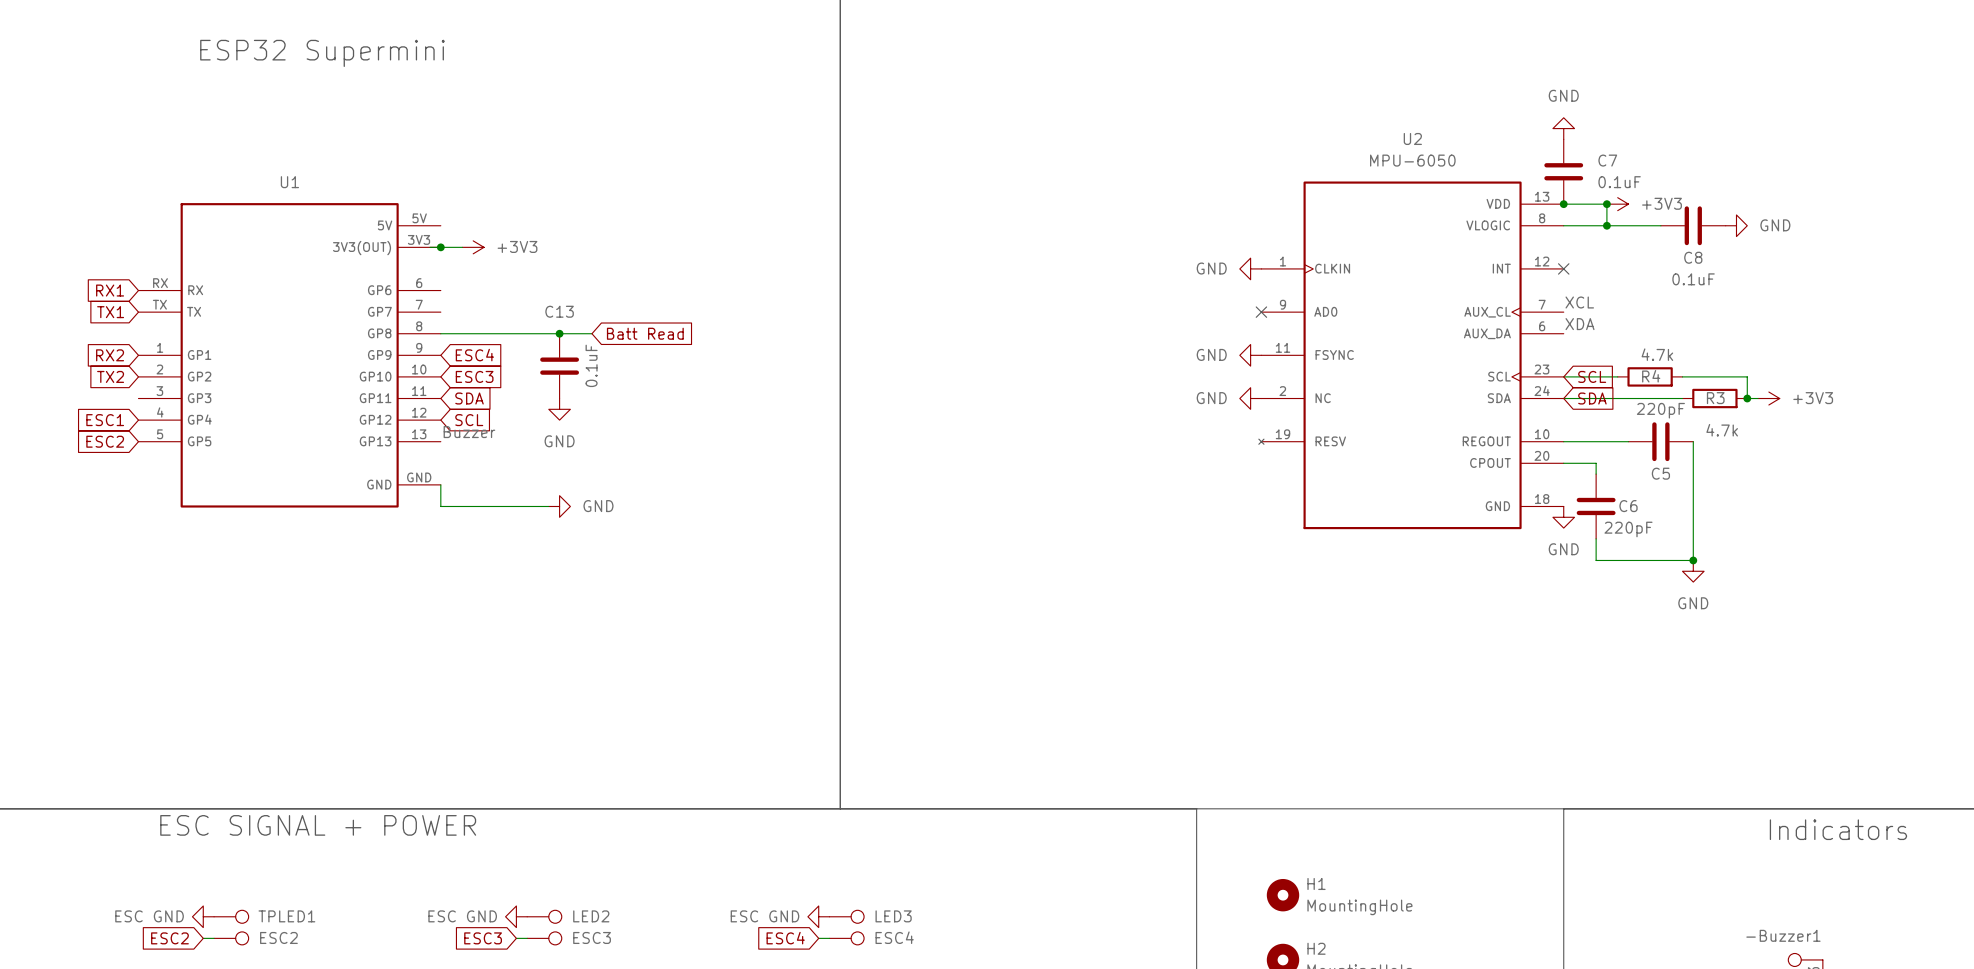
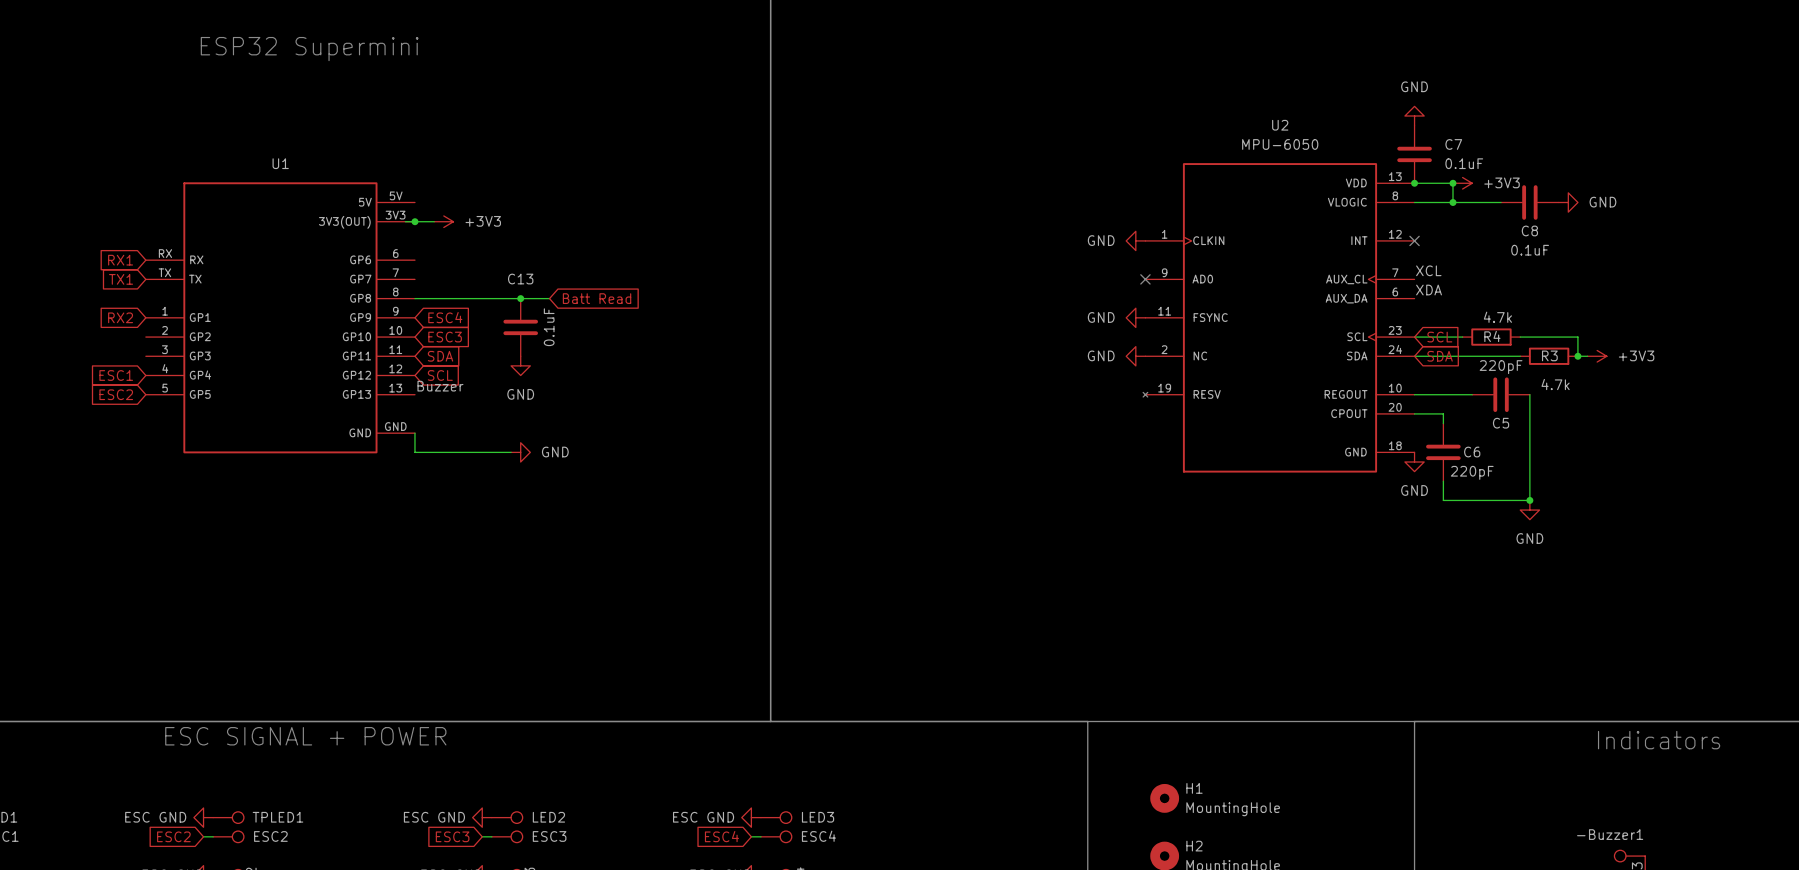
global label: TX2 (110, 376) -> none

